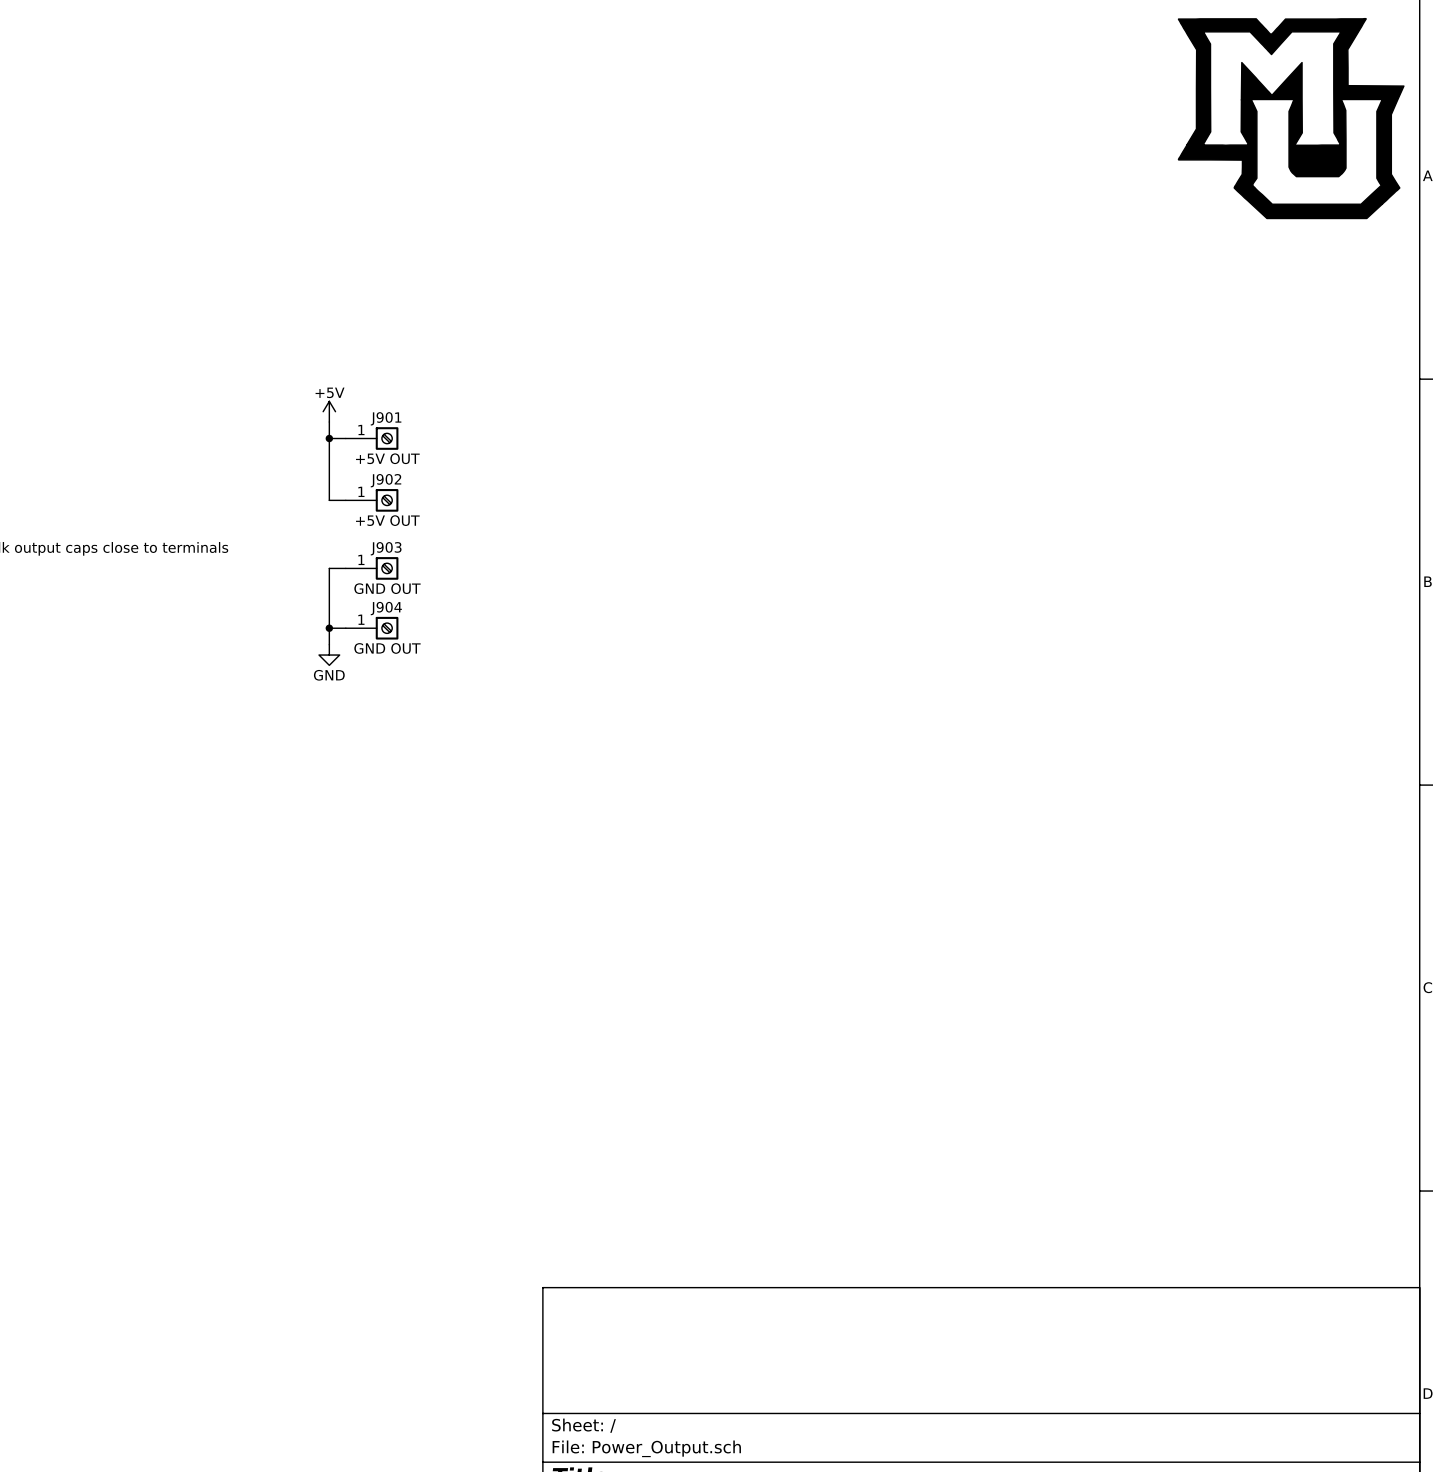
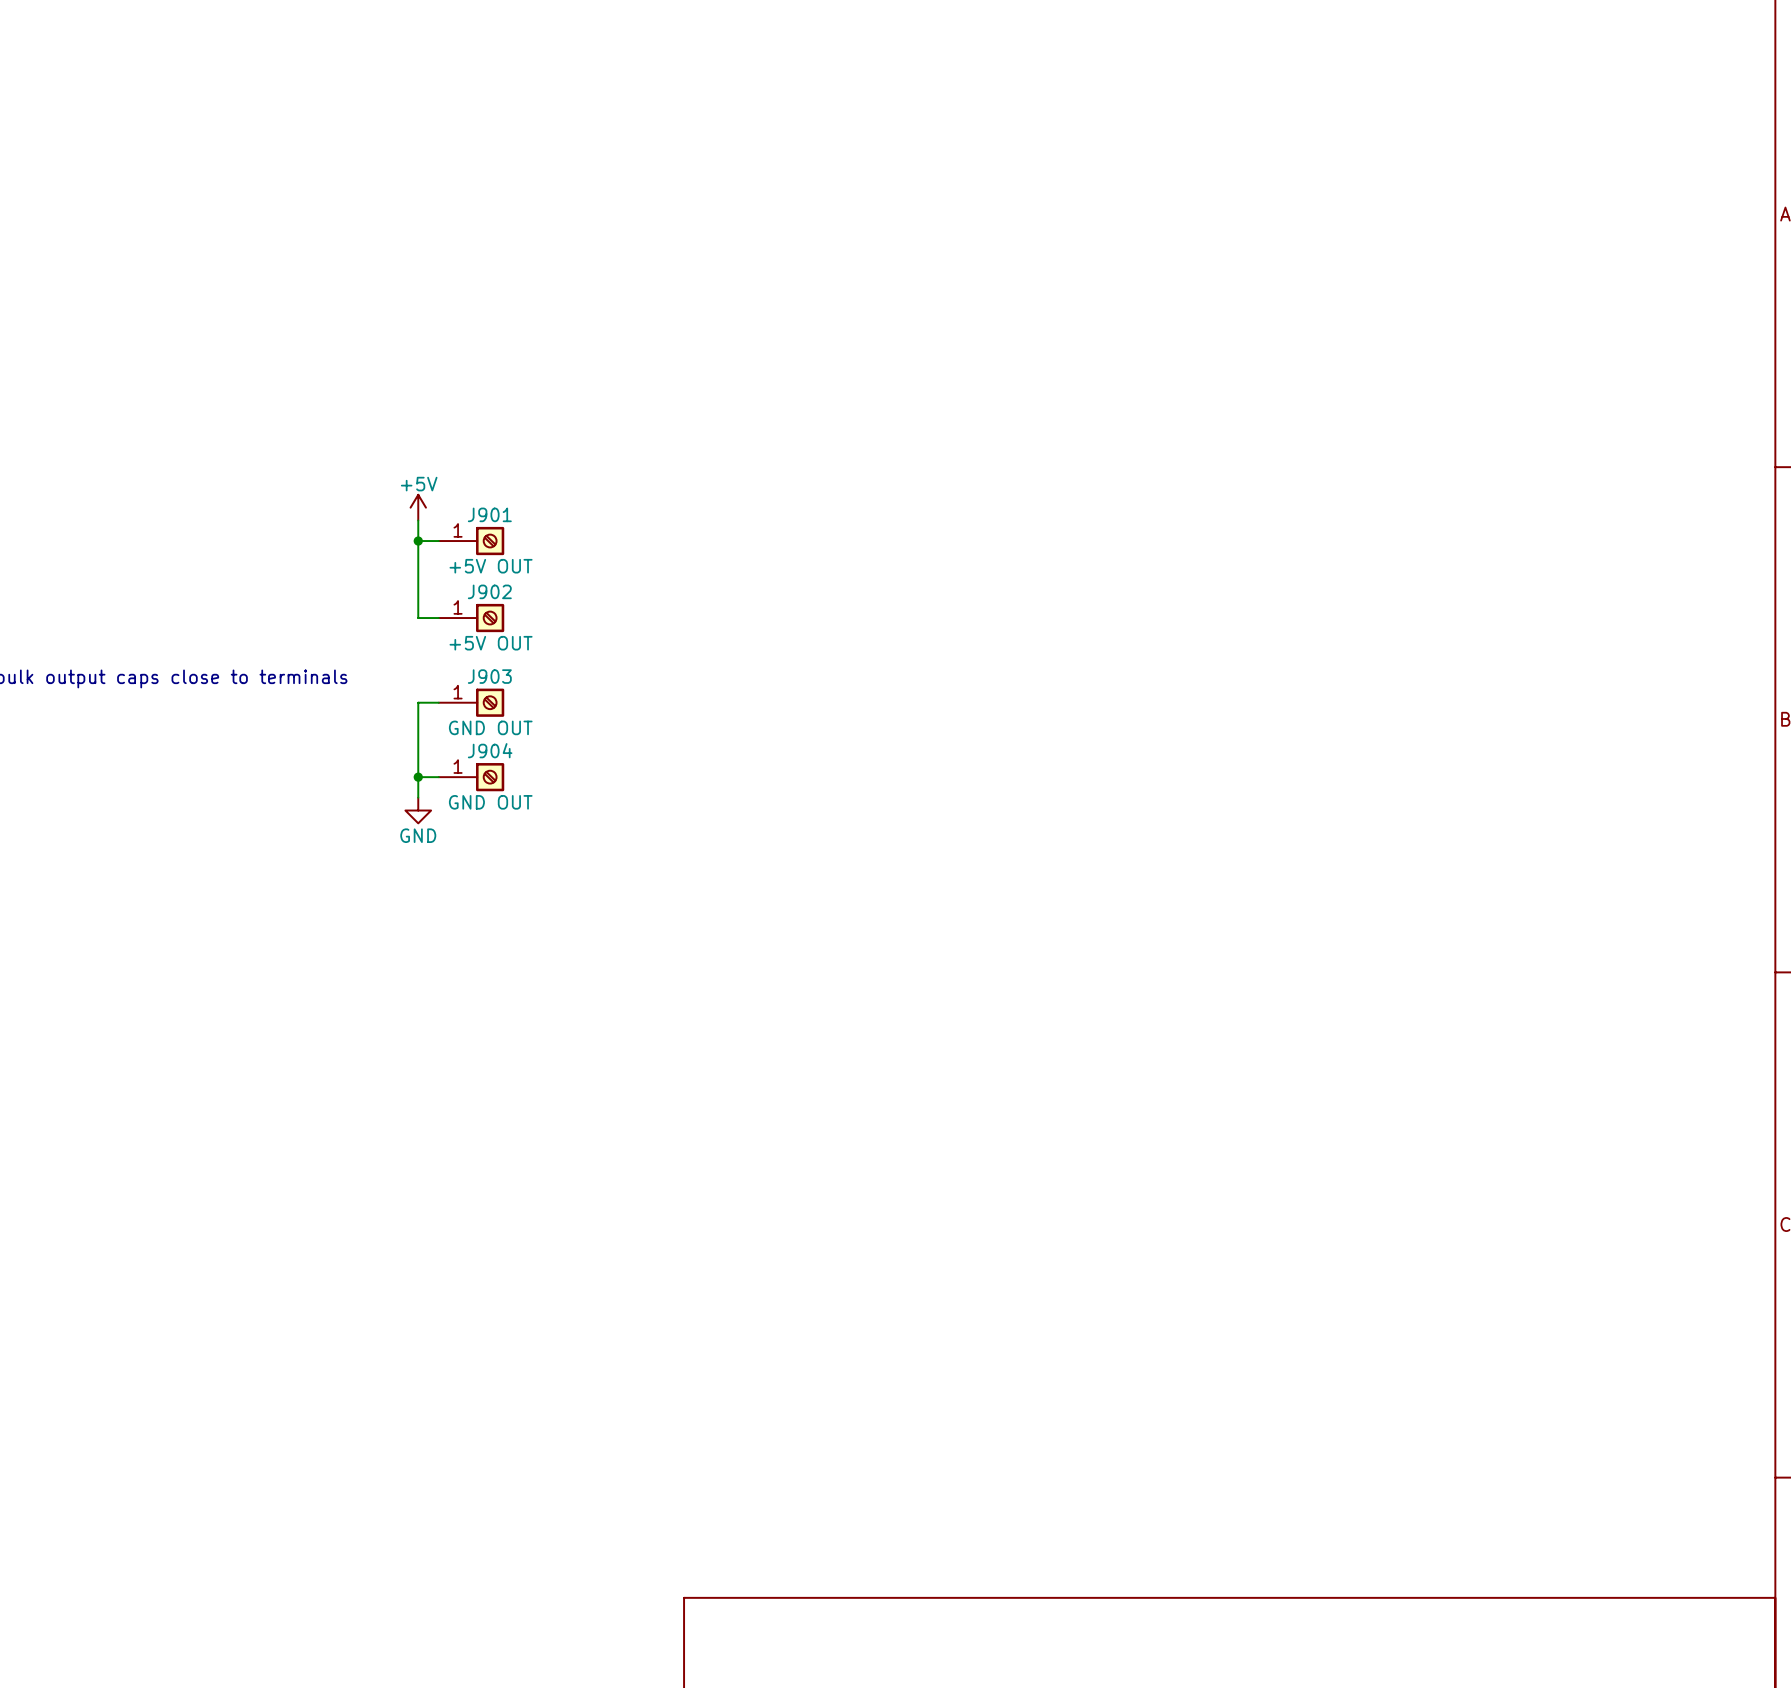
power symbol: (1291, 118) -> none

